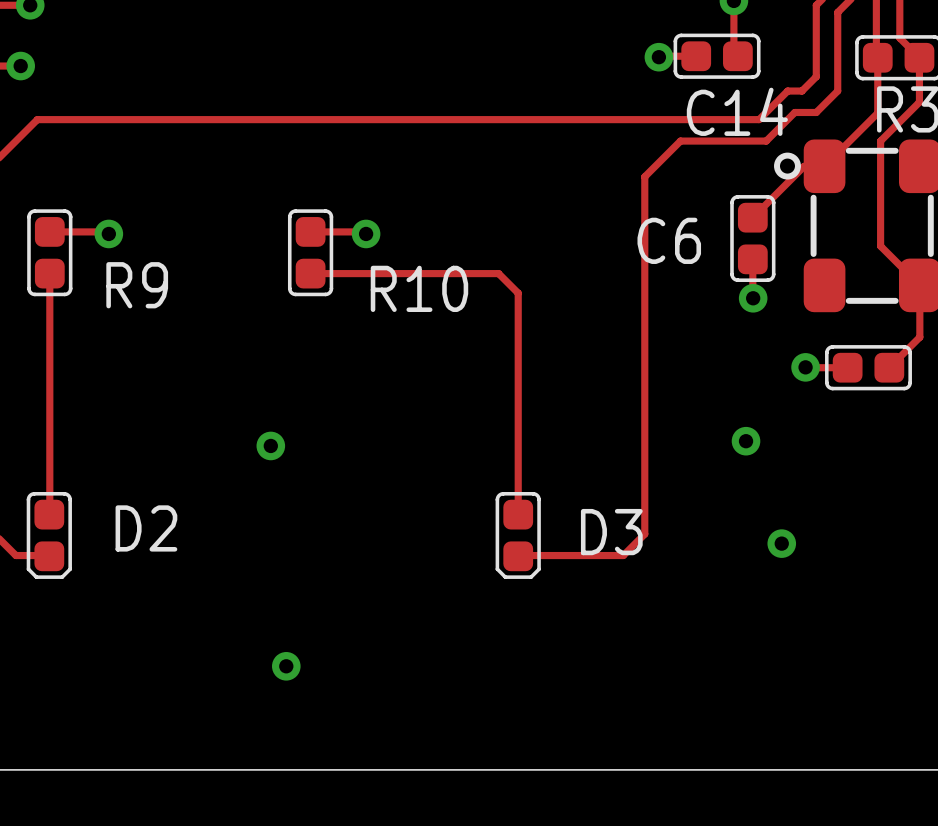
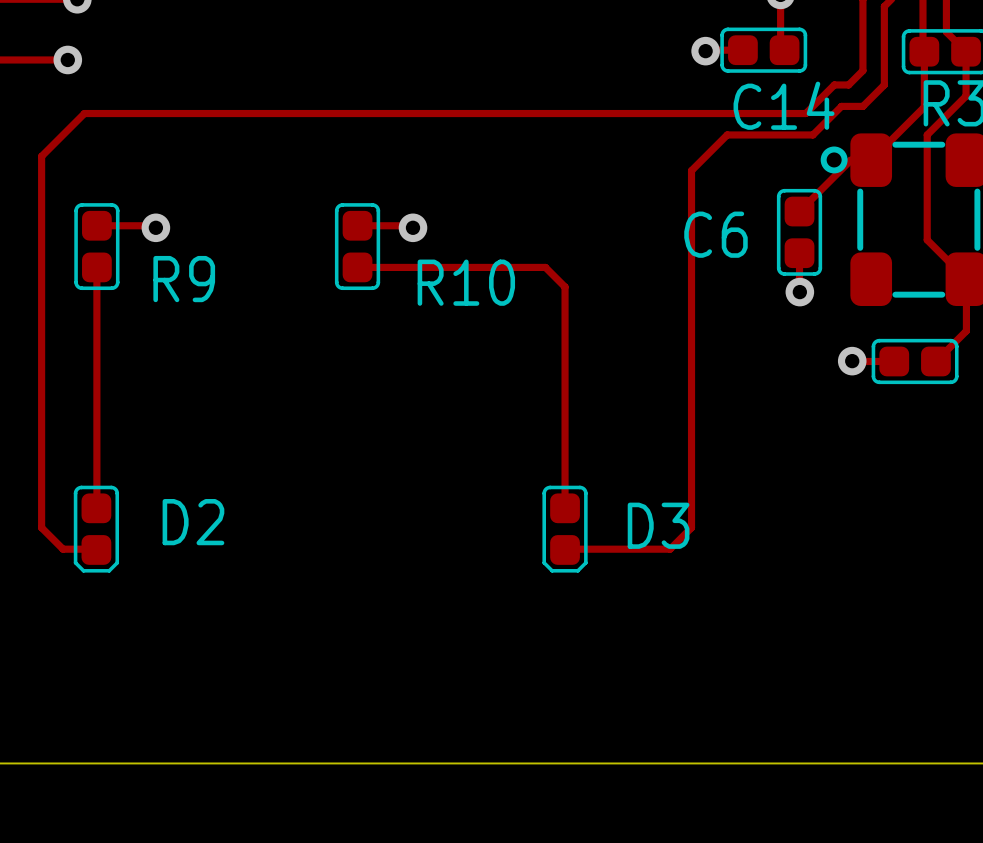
via: (746, 441) -> none
via: (270, 445) -> none
via: (781, 543) -> none
via: (286, 666) -> none

